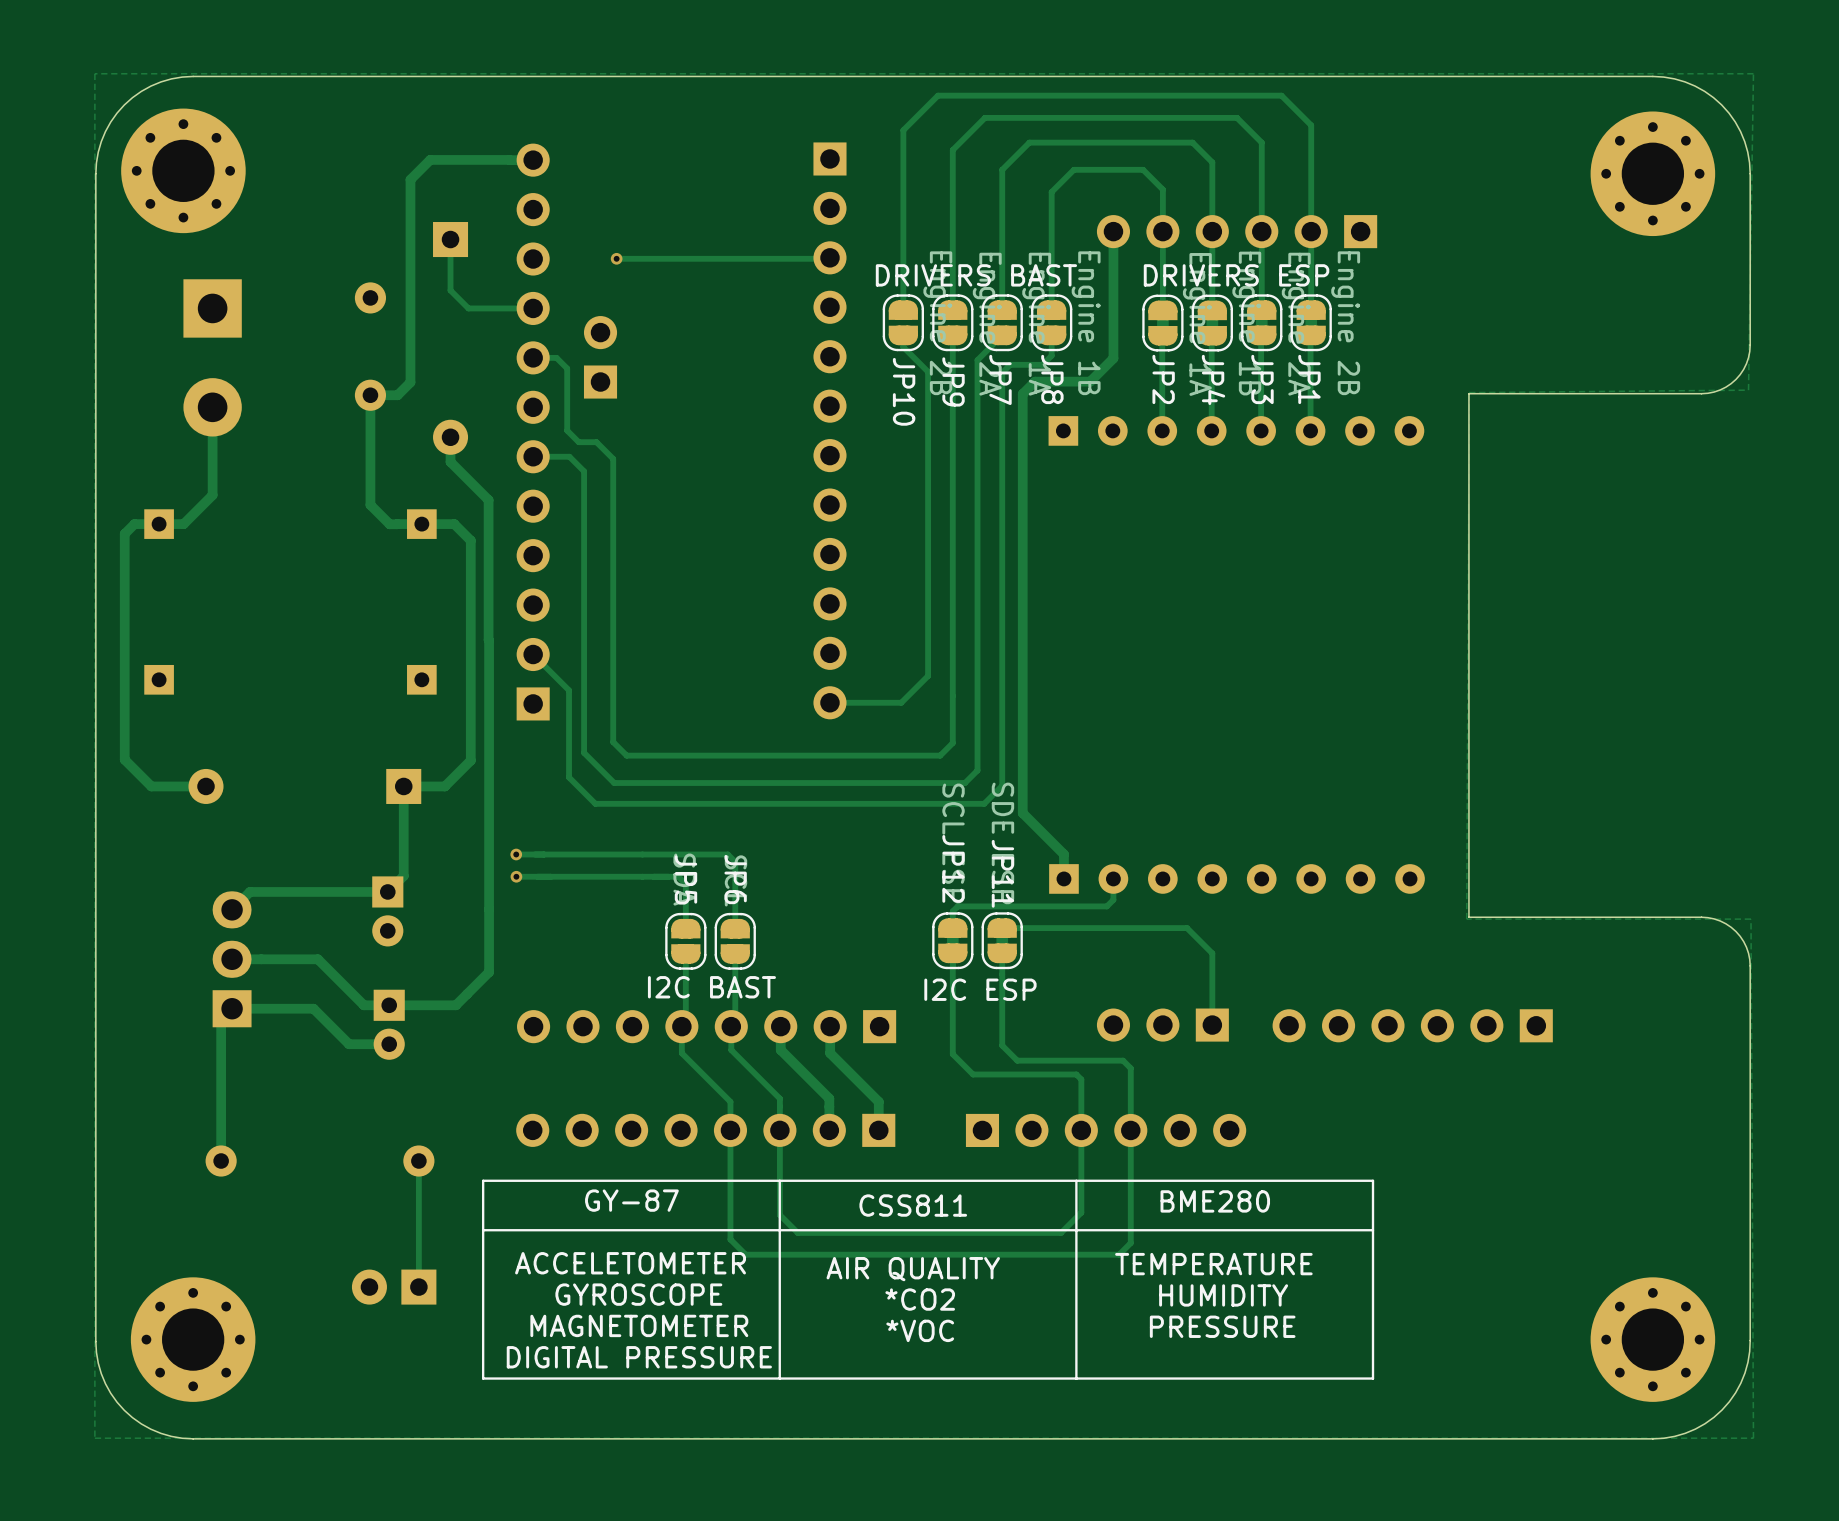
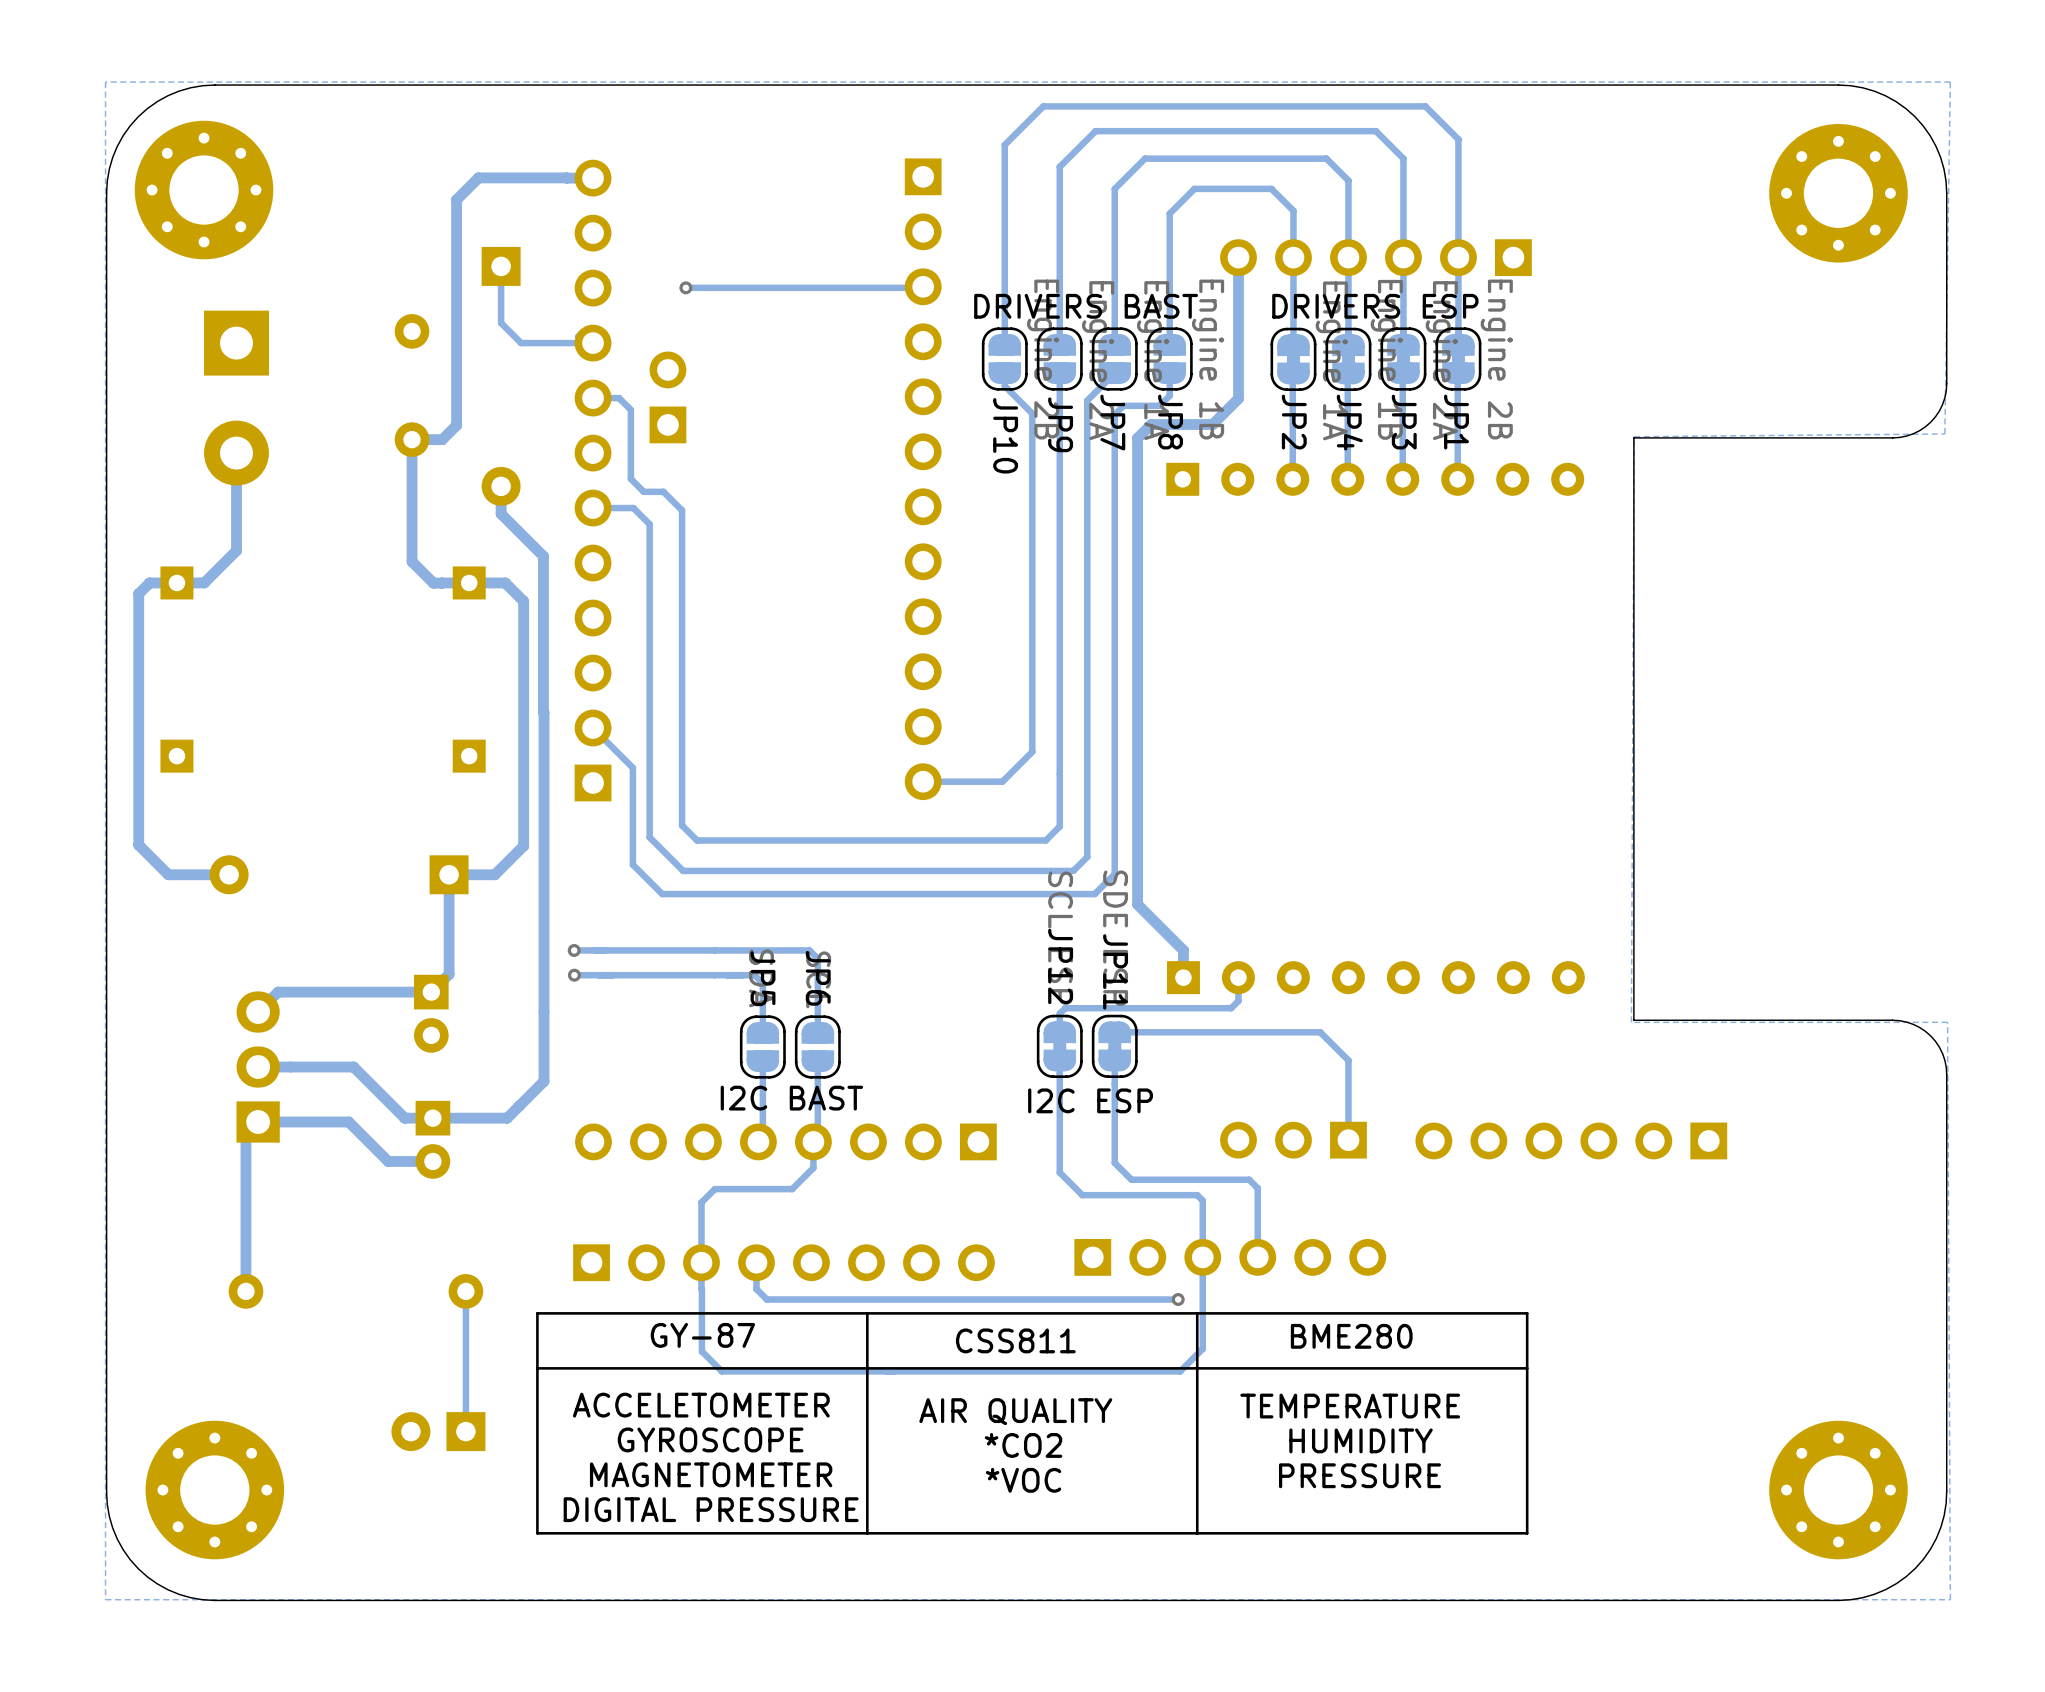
track: (681, 1026) (681, 1053) (730, 1101) (730, 1239) (745, 1254) (1119, 1254) (1130, 1243) (1130, 1130) -> none
track: (780, 1026) (780, 1050) (829, 1098) (829, 1130) -> none
track: (830, 1026) (830, 1053) (878, 1101) (878, 1130) (873, 1136) -> none
track: (731, 1050) (779, 1098) (779, 1215) (797, 1232) -> (813, 1167) (792, 1189) (714, 1189) (701, 1202) (701, 1351) (721, 1371) (887, 1371)
part rotation: 0° (705, 1130) -> 180° (783, 1262)
track: none -> (756, 1262) (756, 1289) (766, 1299) (1178, 1299)
via: none -> (1178, 1299)

